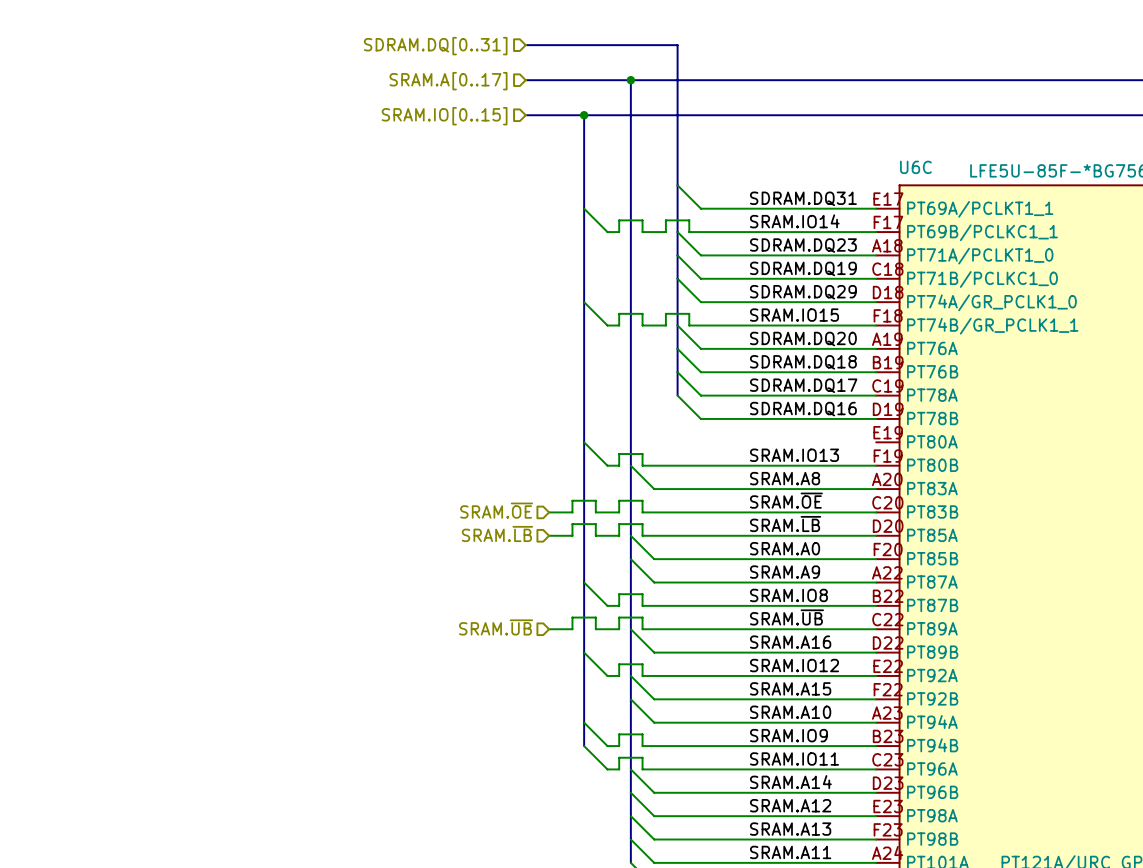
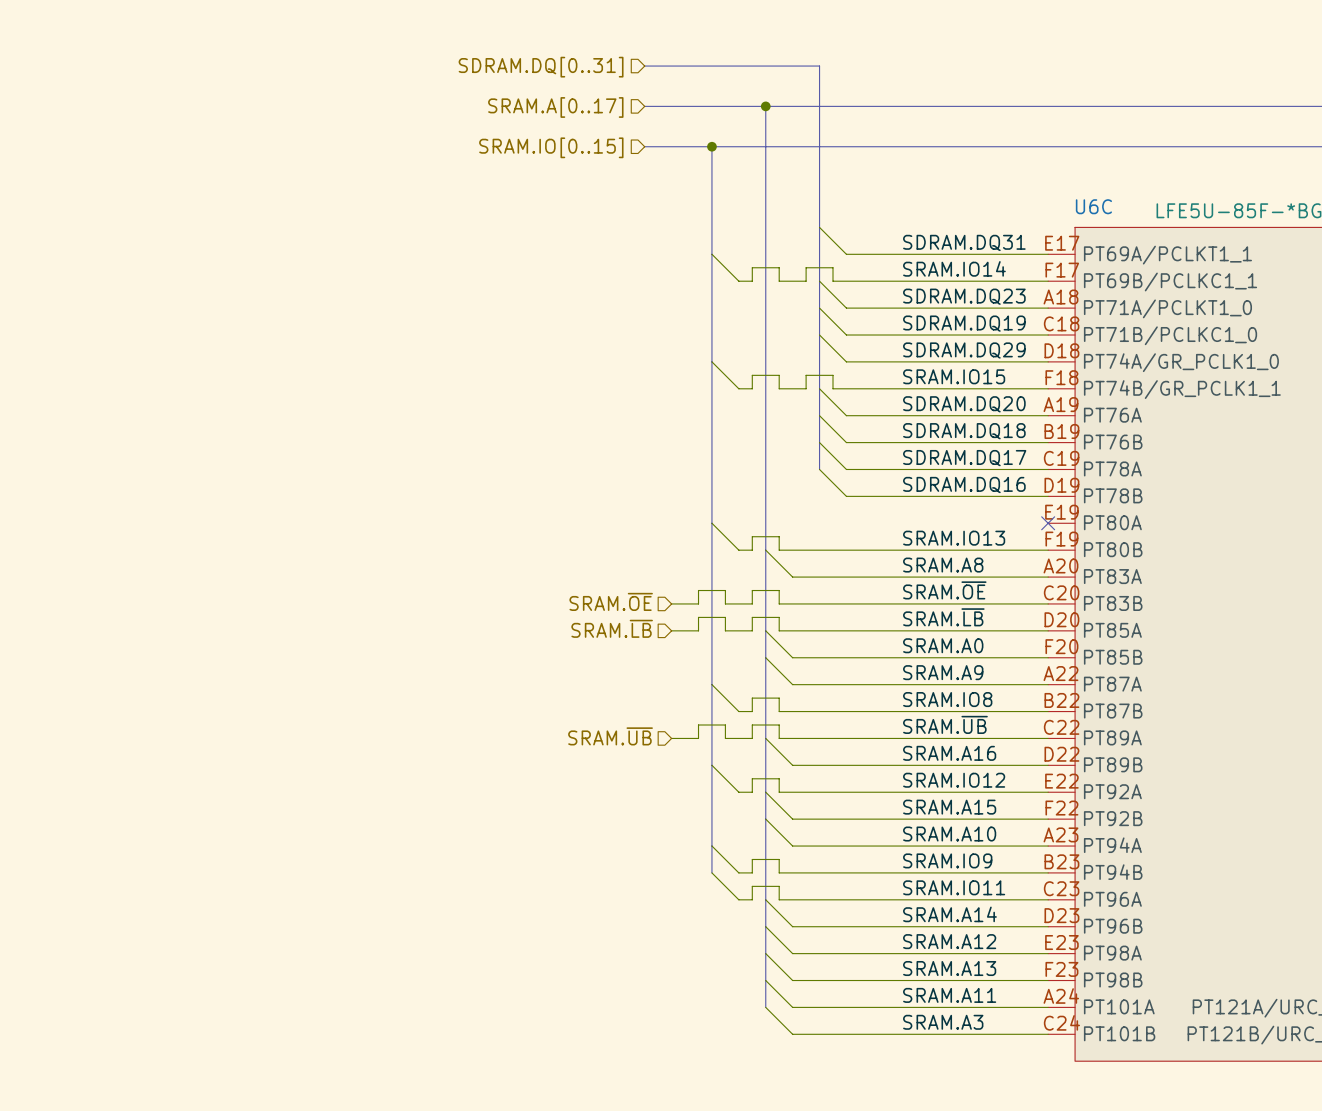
no-connect mark: none -> (1048, 523)

